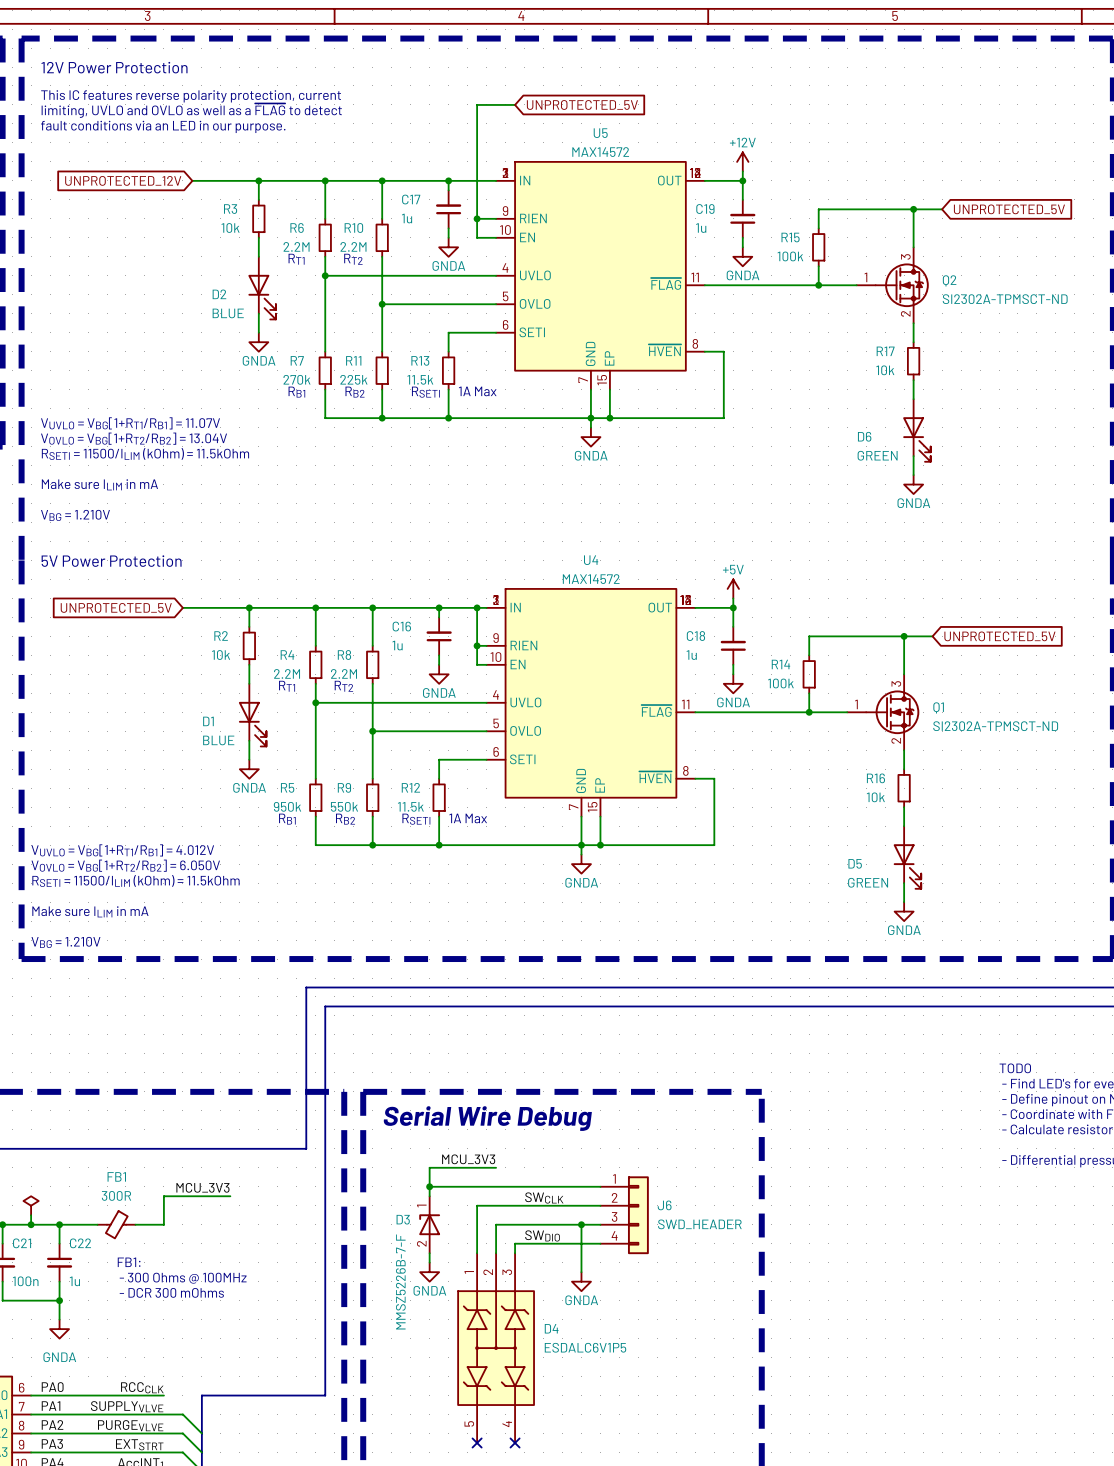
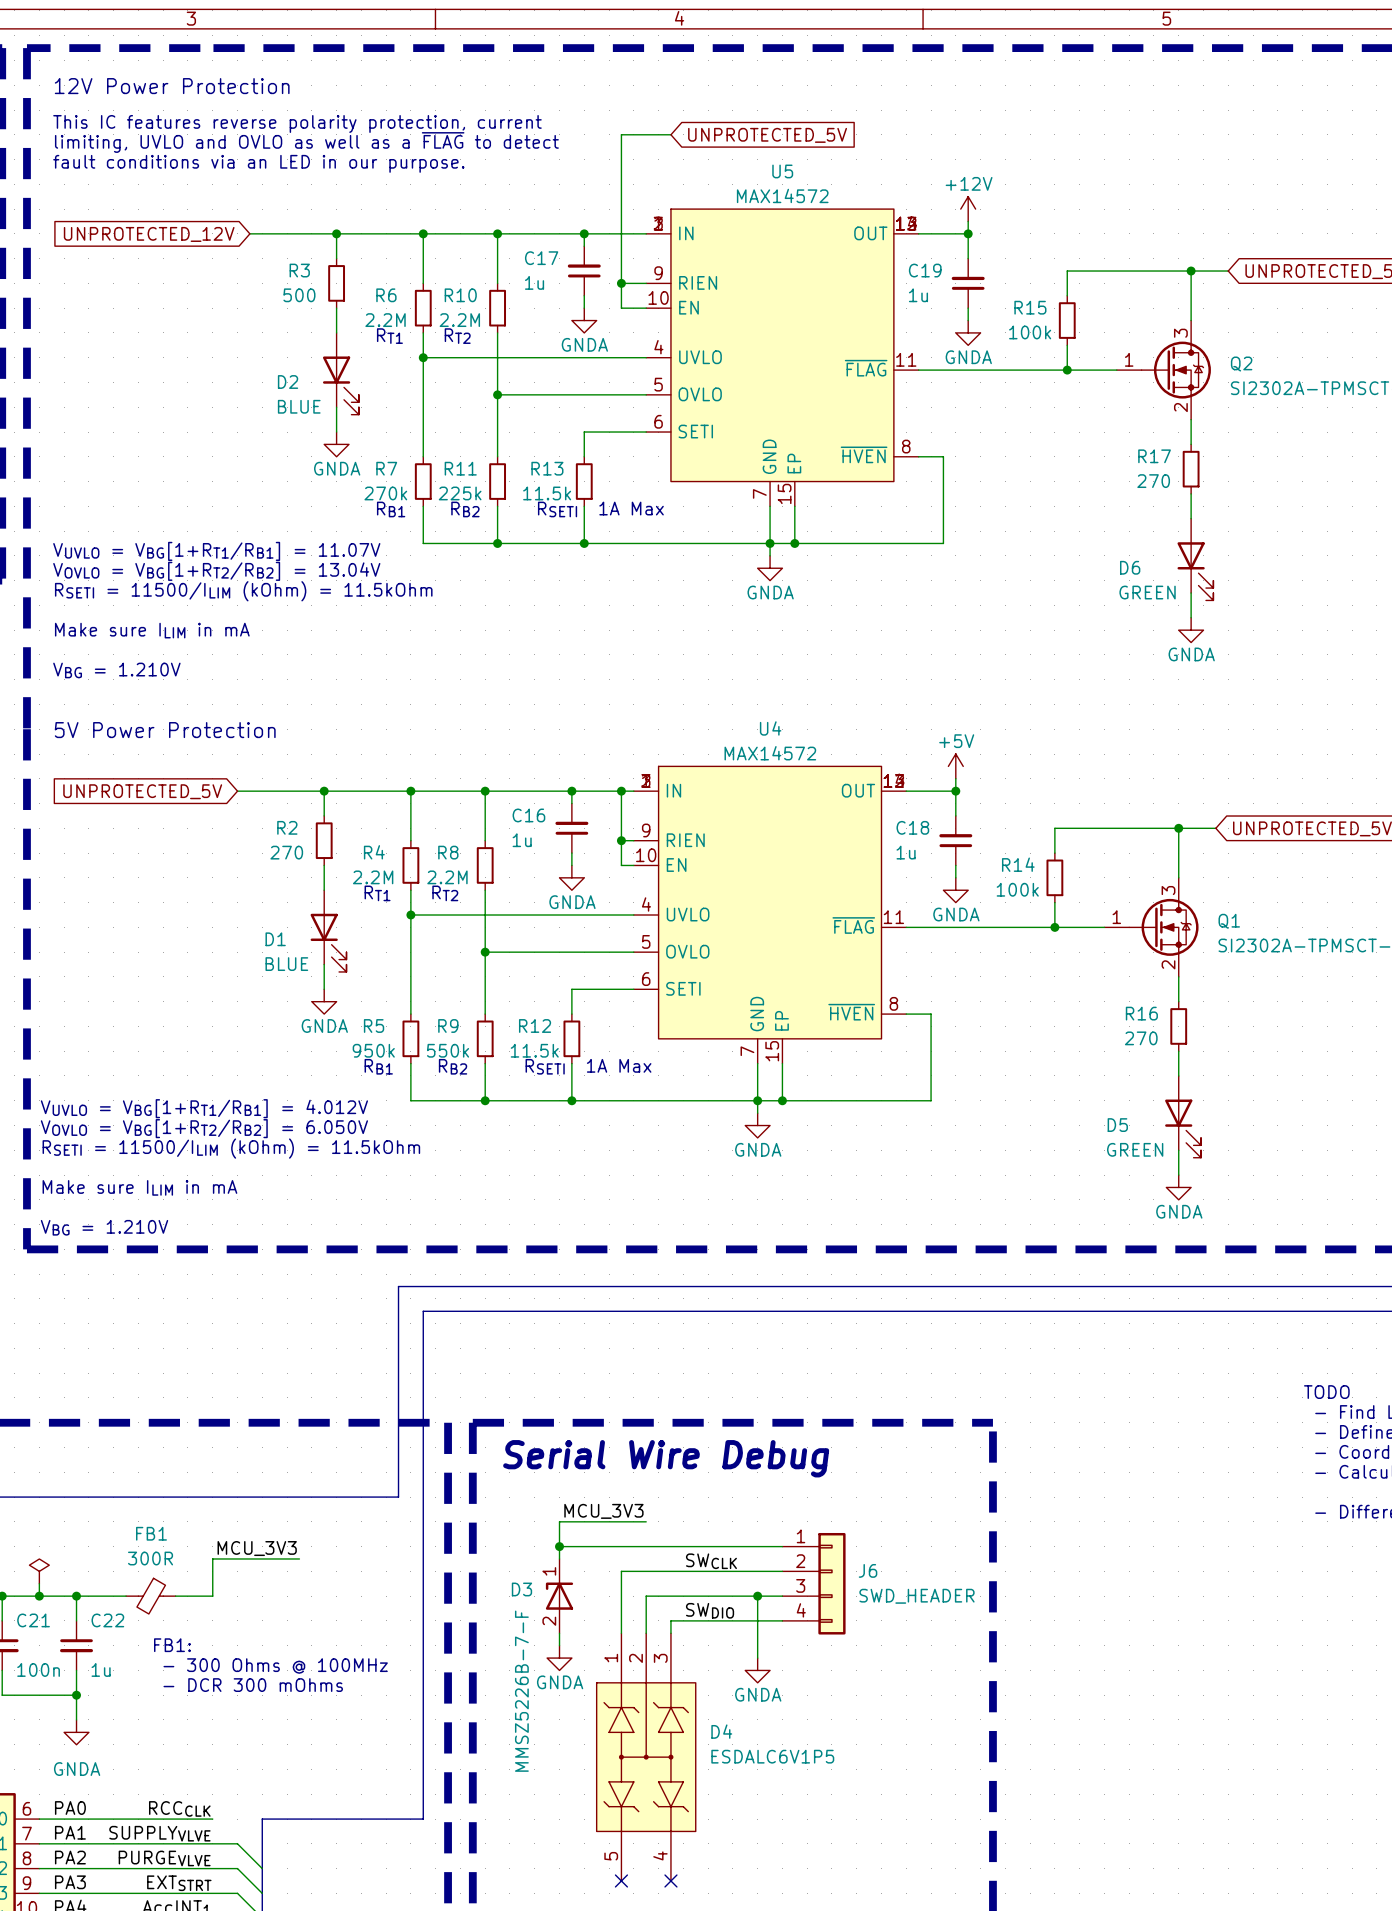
R3 value: 10k (230, 227) -> 500 (299, 295)
R17 value: 10k (885, 370) -> 270 (1153, 481)
R2 value: 10k (221, 655) -> 270 (286, 852)
R16 value: 10k (875, 797) -> 270 (1141, 1038)

